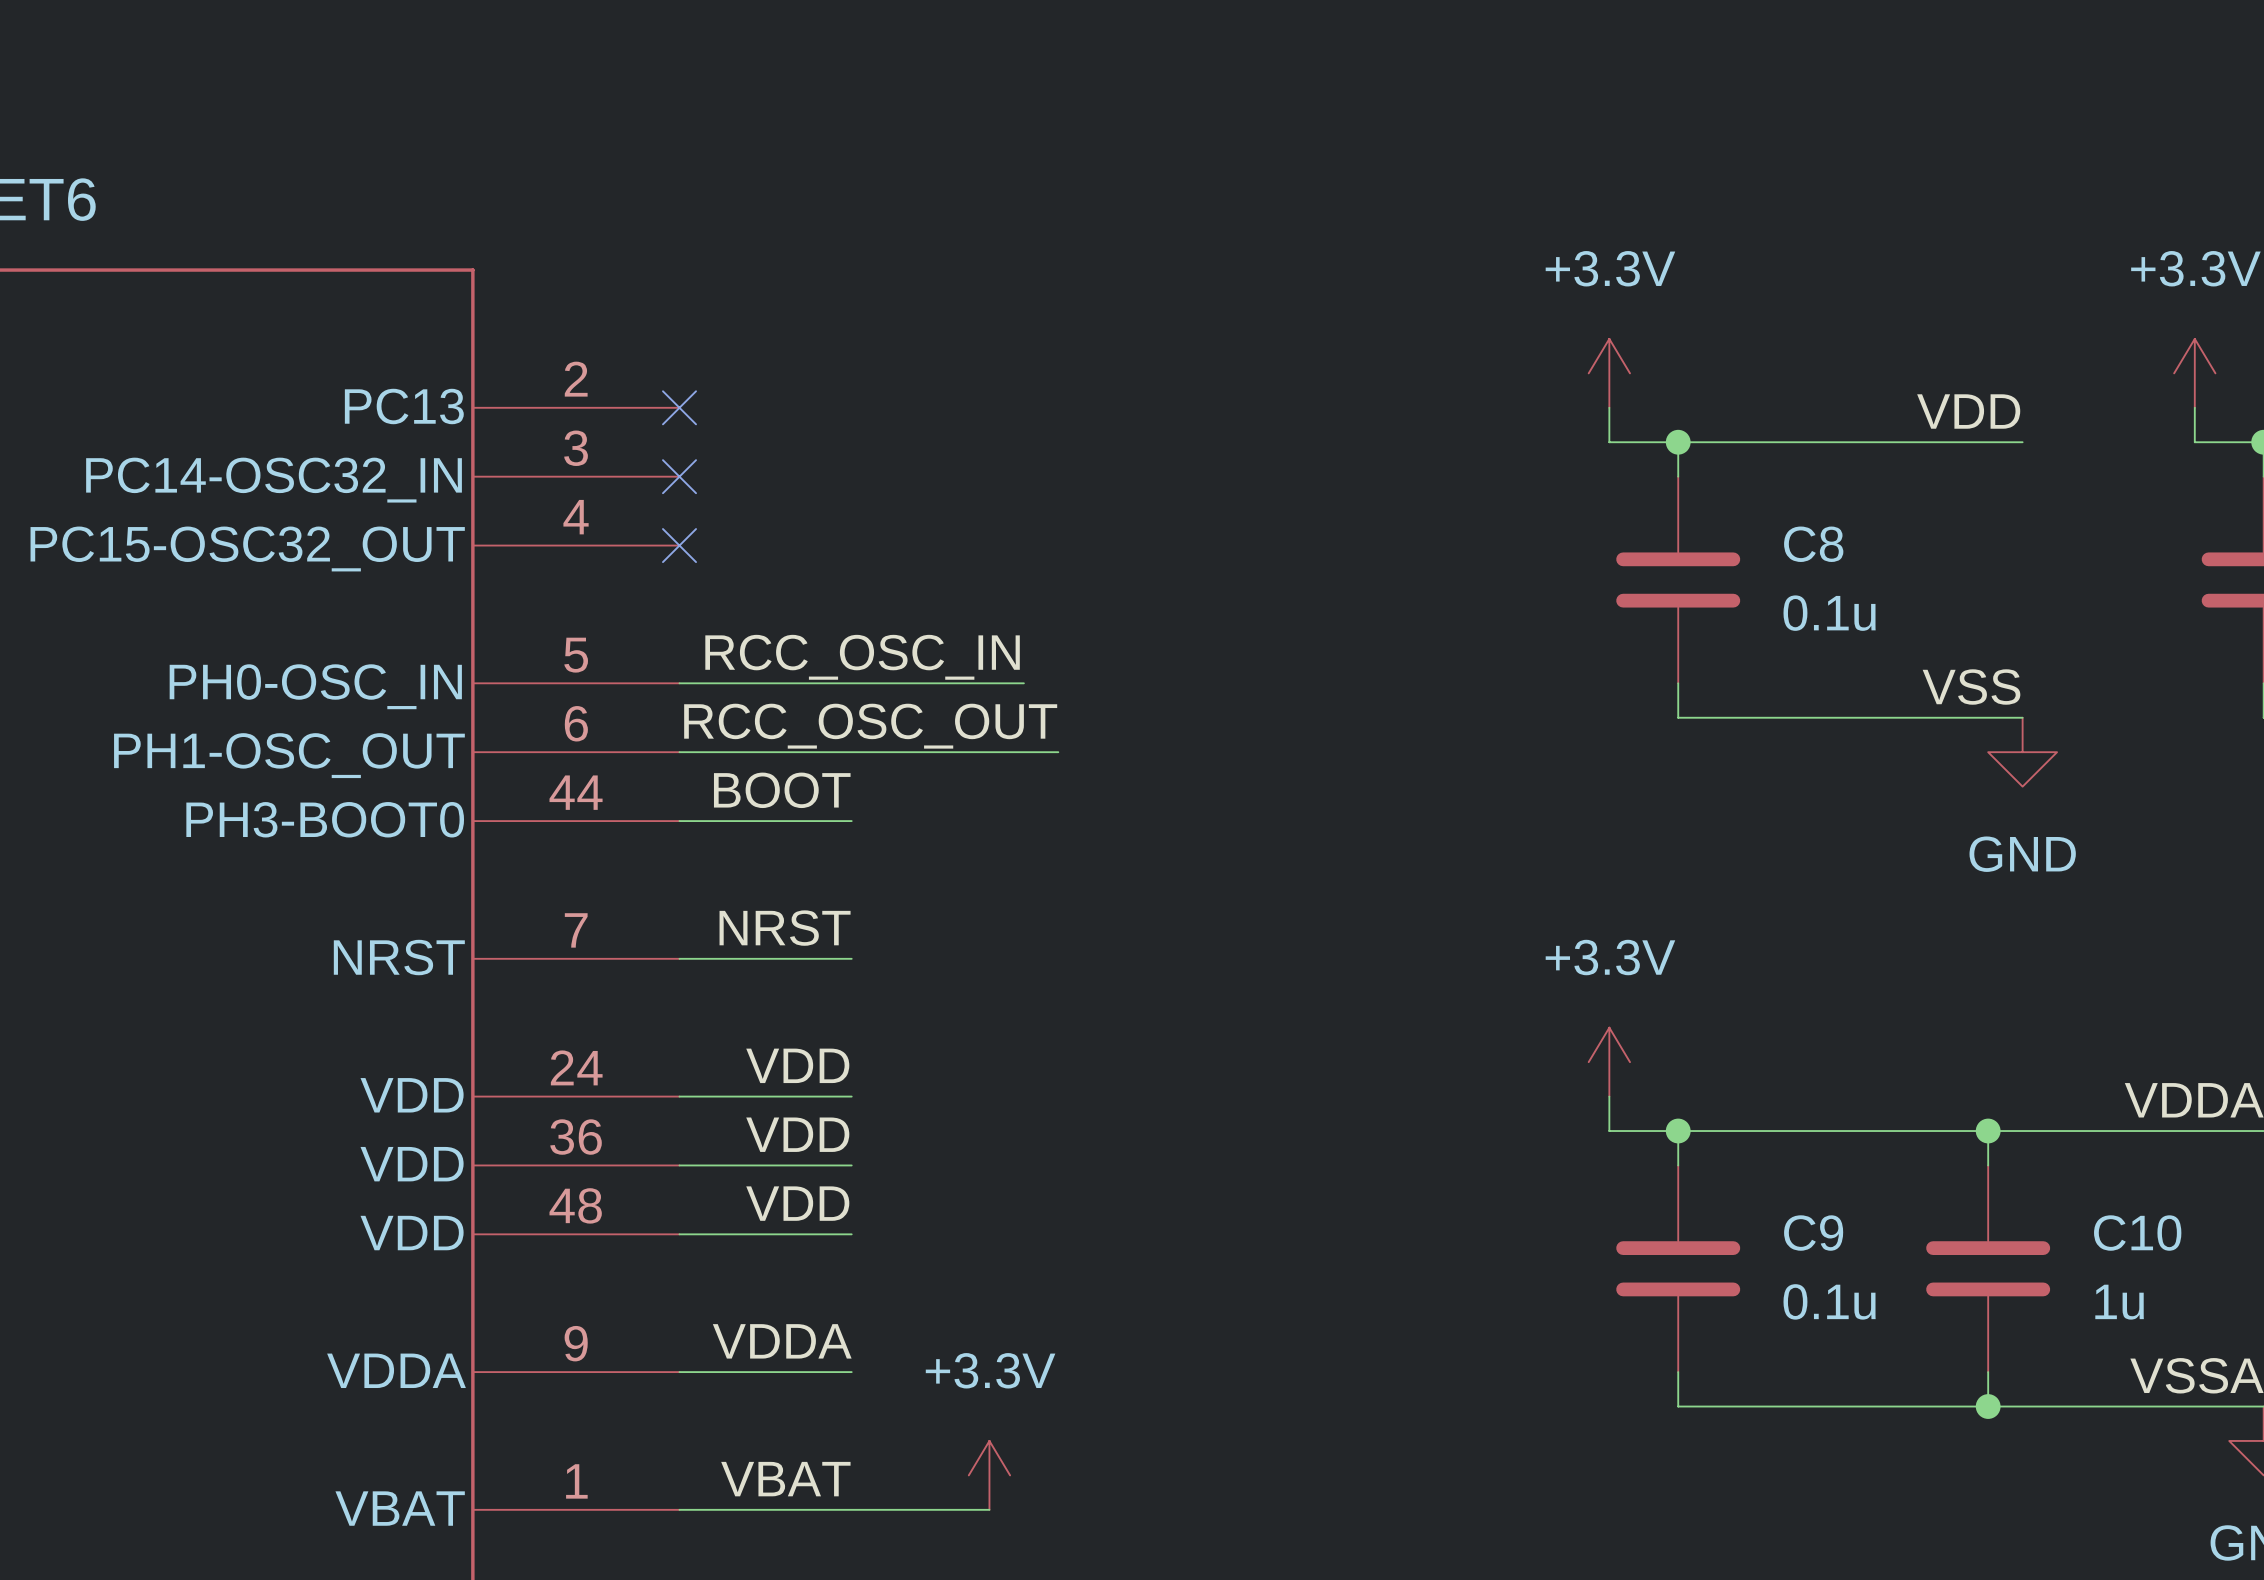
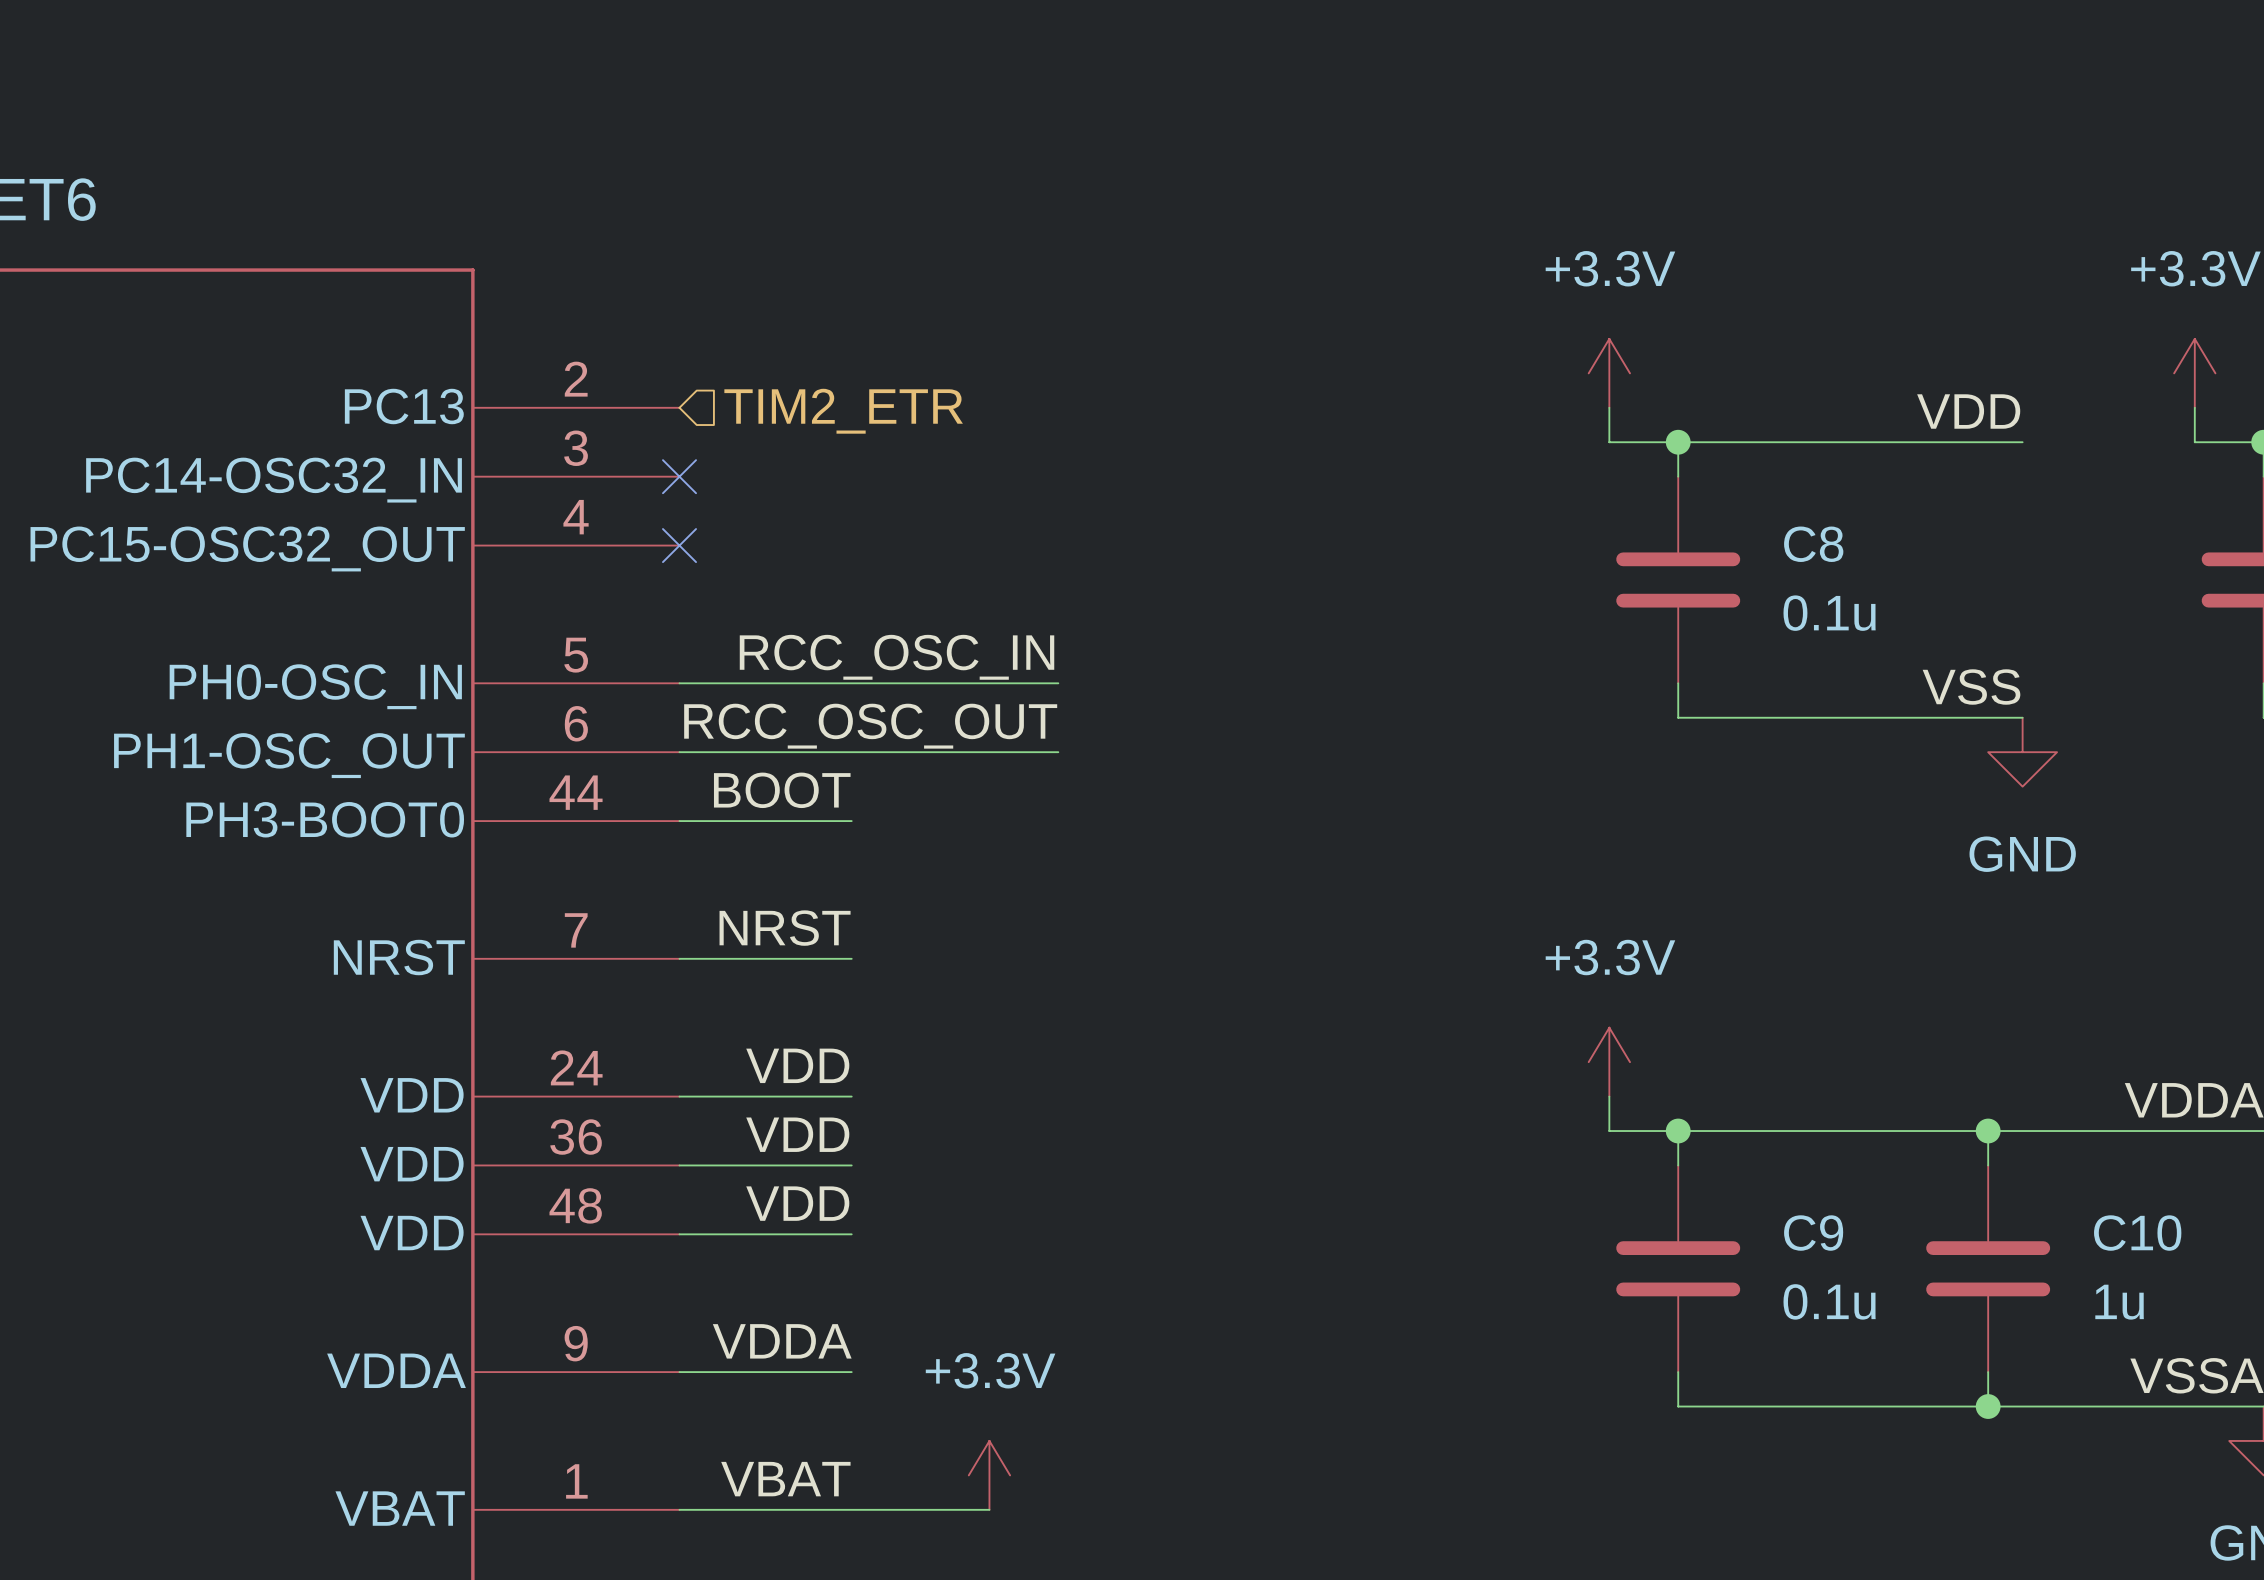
no-connect mark: (679, 407) -> none
hierarchical label: none -> TIM2_ETR (843, 411)
label position: RCC_OSC_IN (862, 657) -> RCC_OSC_IN (897, 657)
wire: none -> (1023, 683) (1058, 683)

